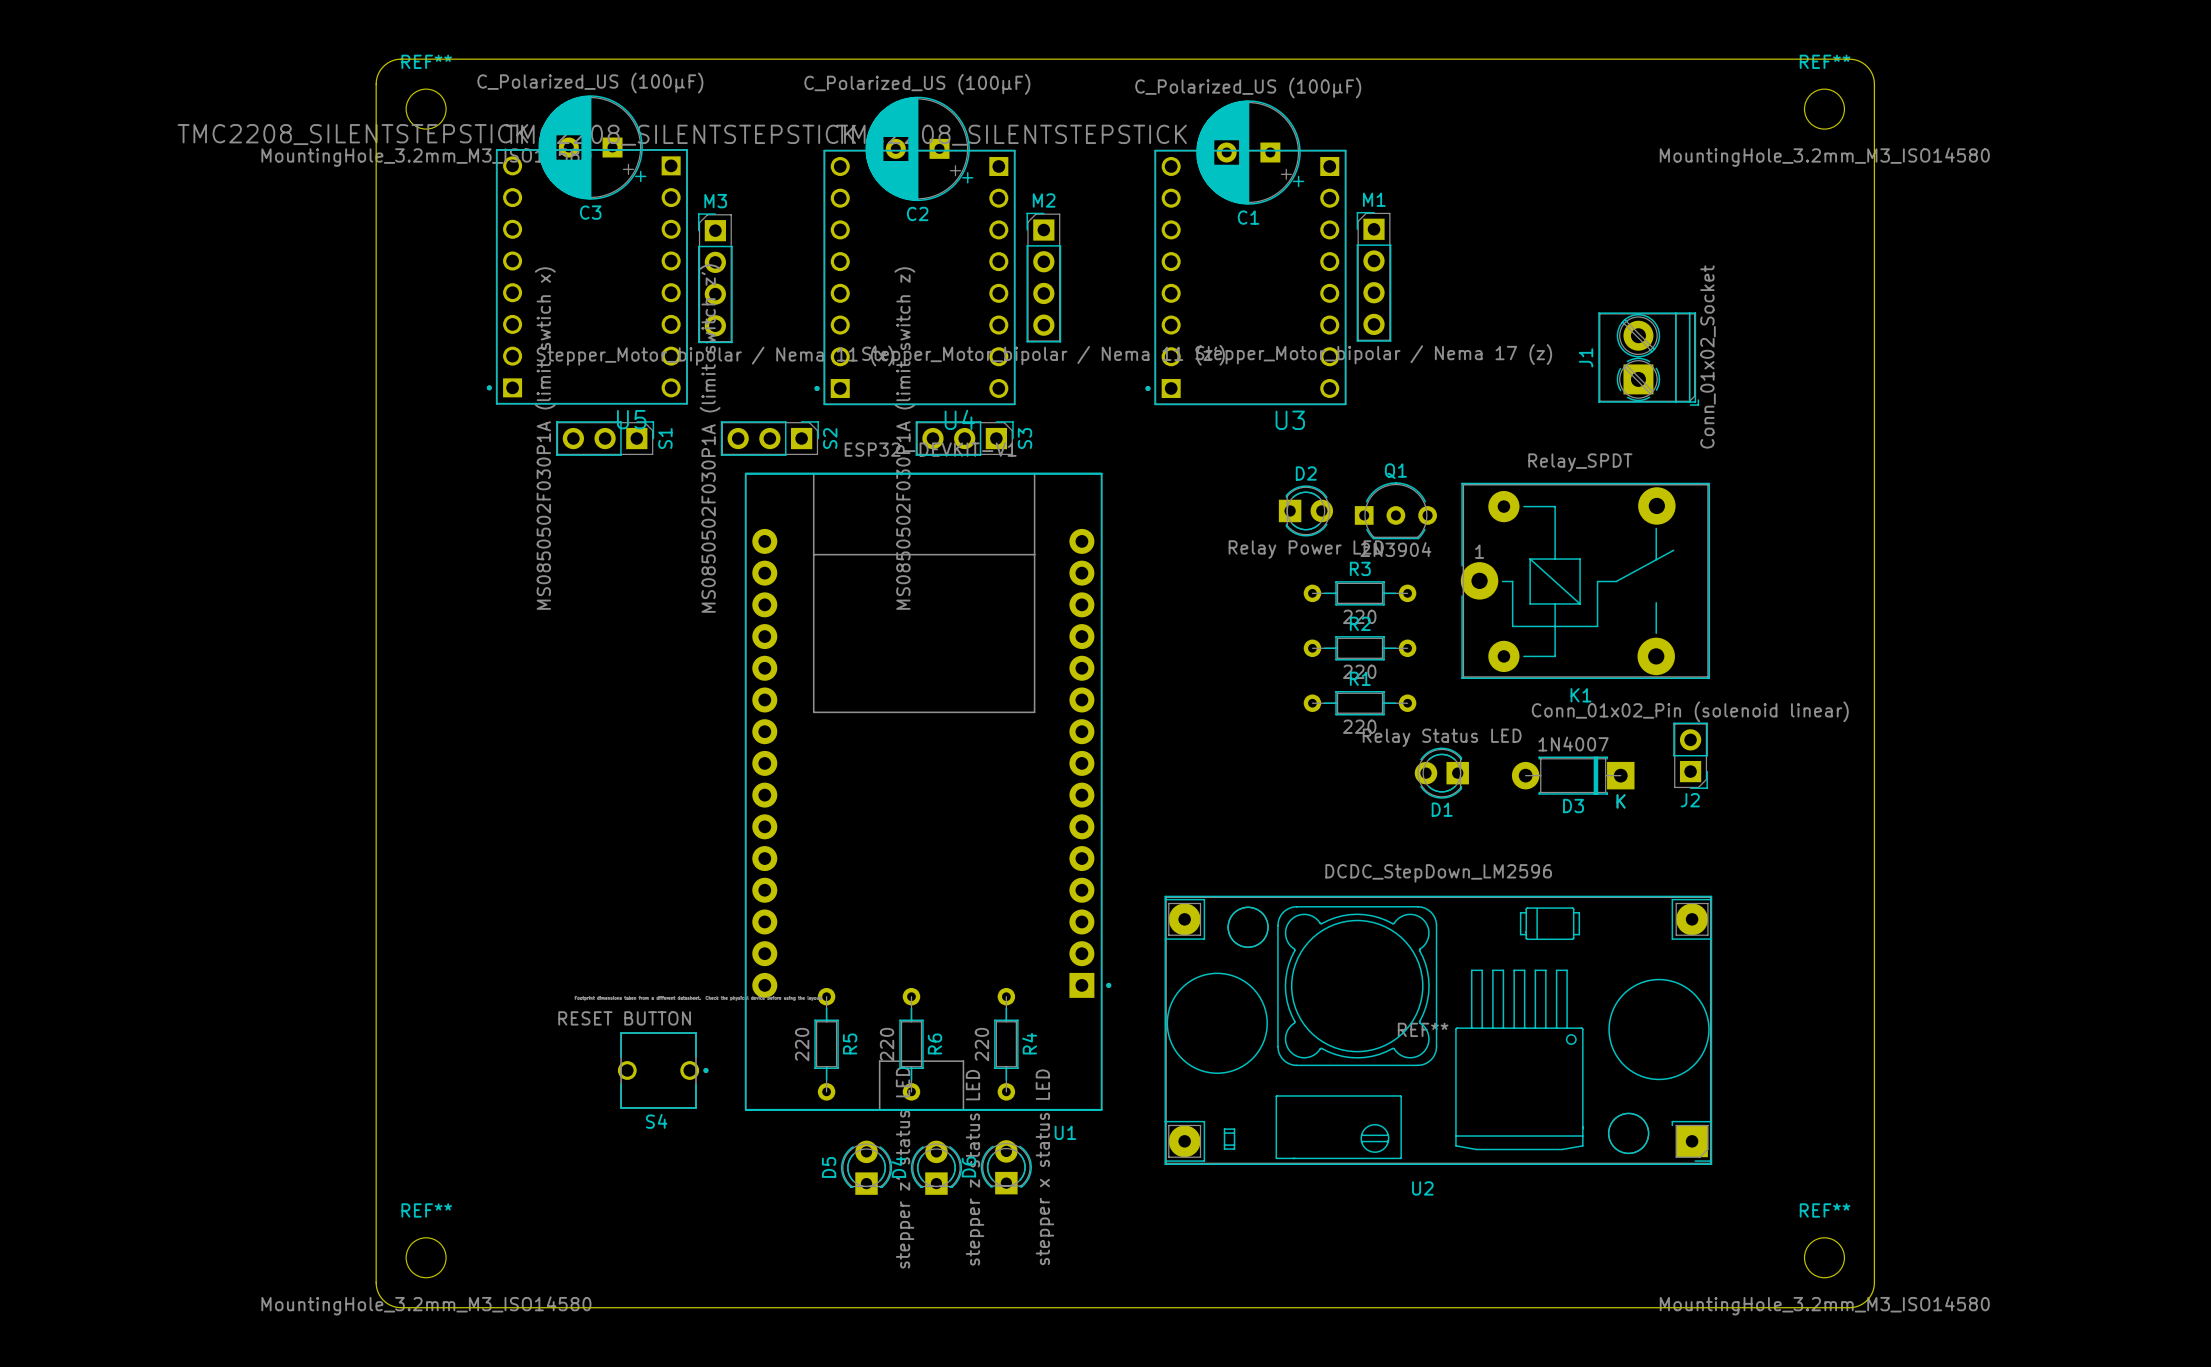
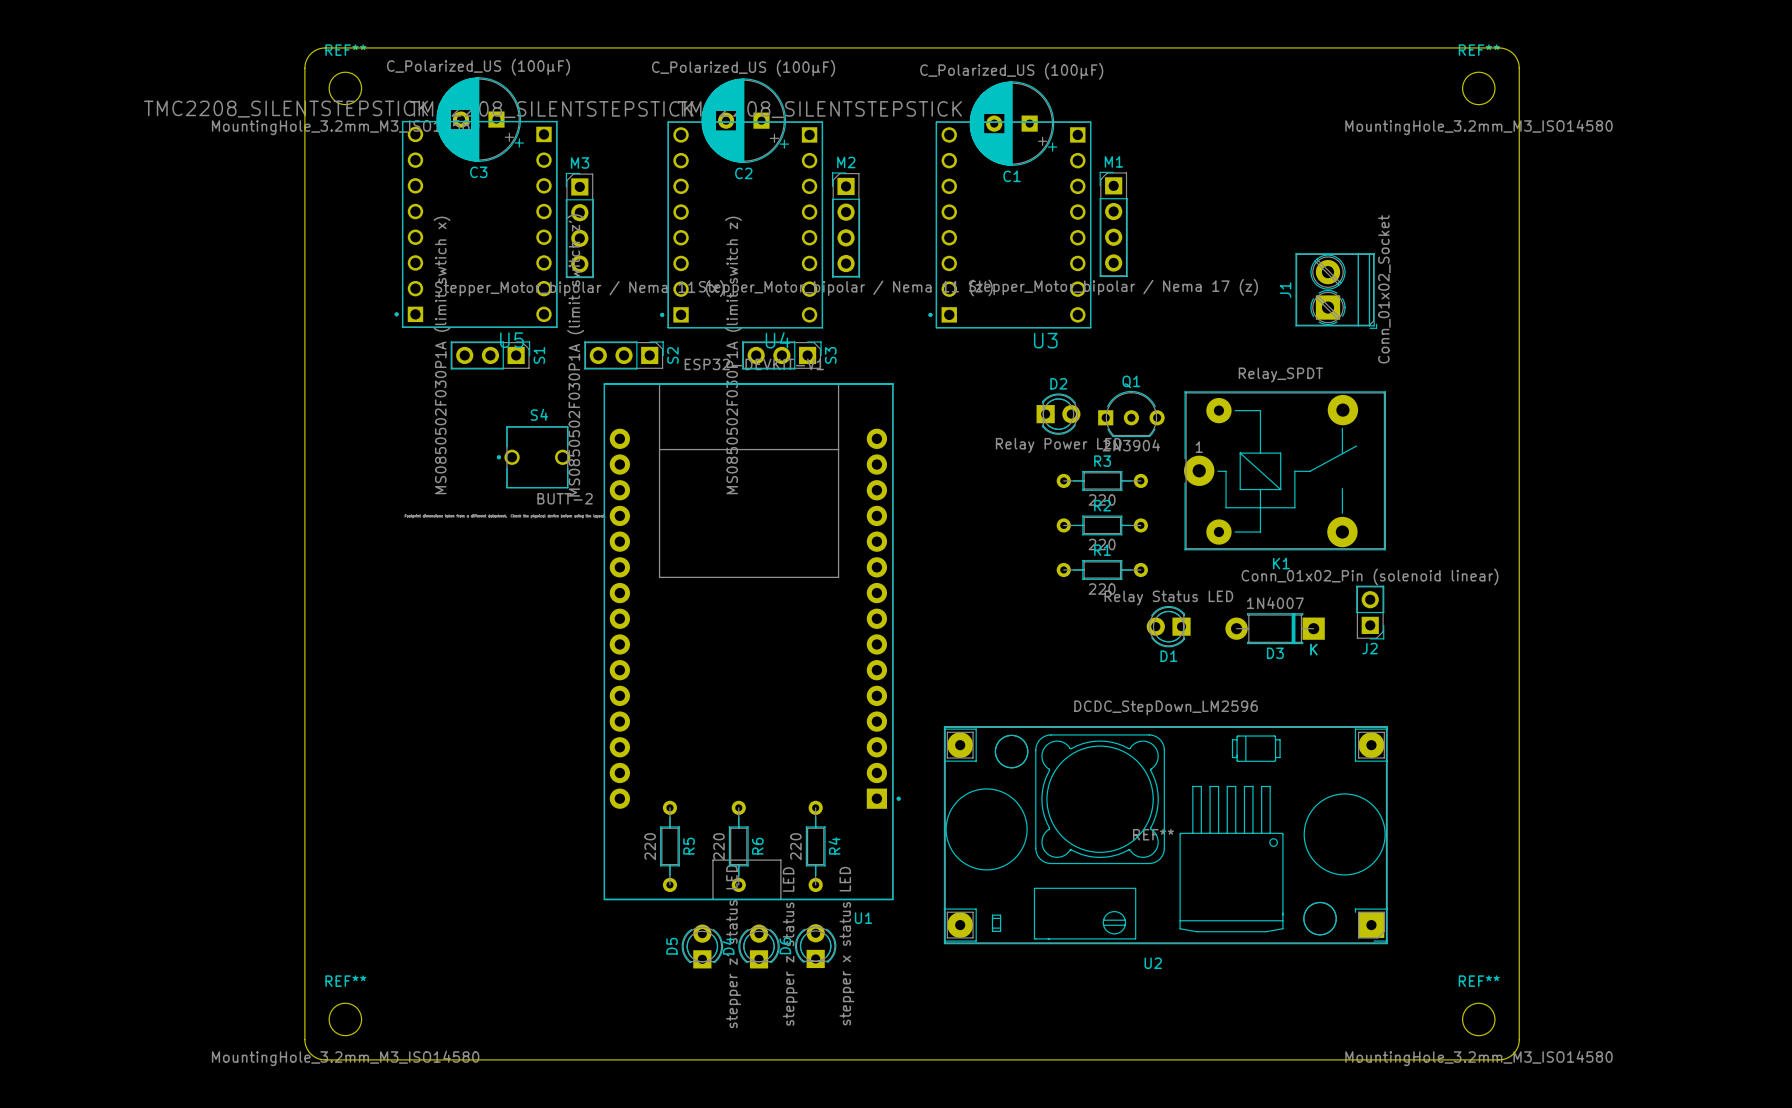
S4 value: RESET BUTTON (624, 1018) -> BUTT-2 (565, 498)
S4 rotation: 0° (663, 1070) -> 180° (533, 457)
S4 position: (663, 1070) -> (533, 457)

